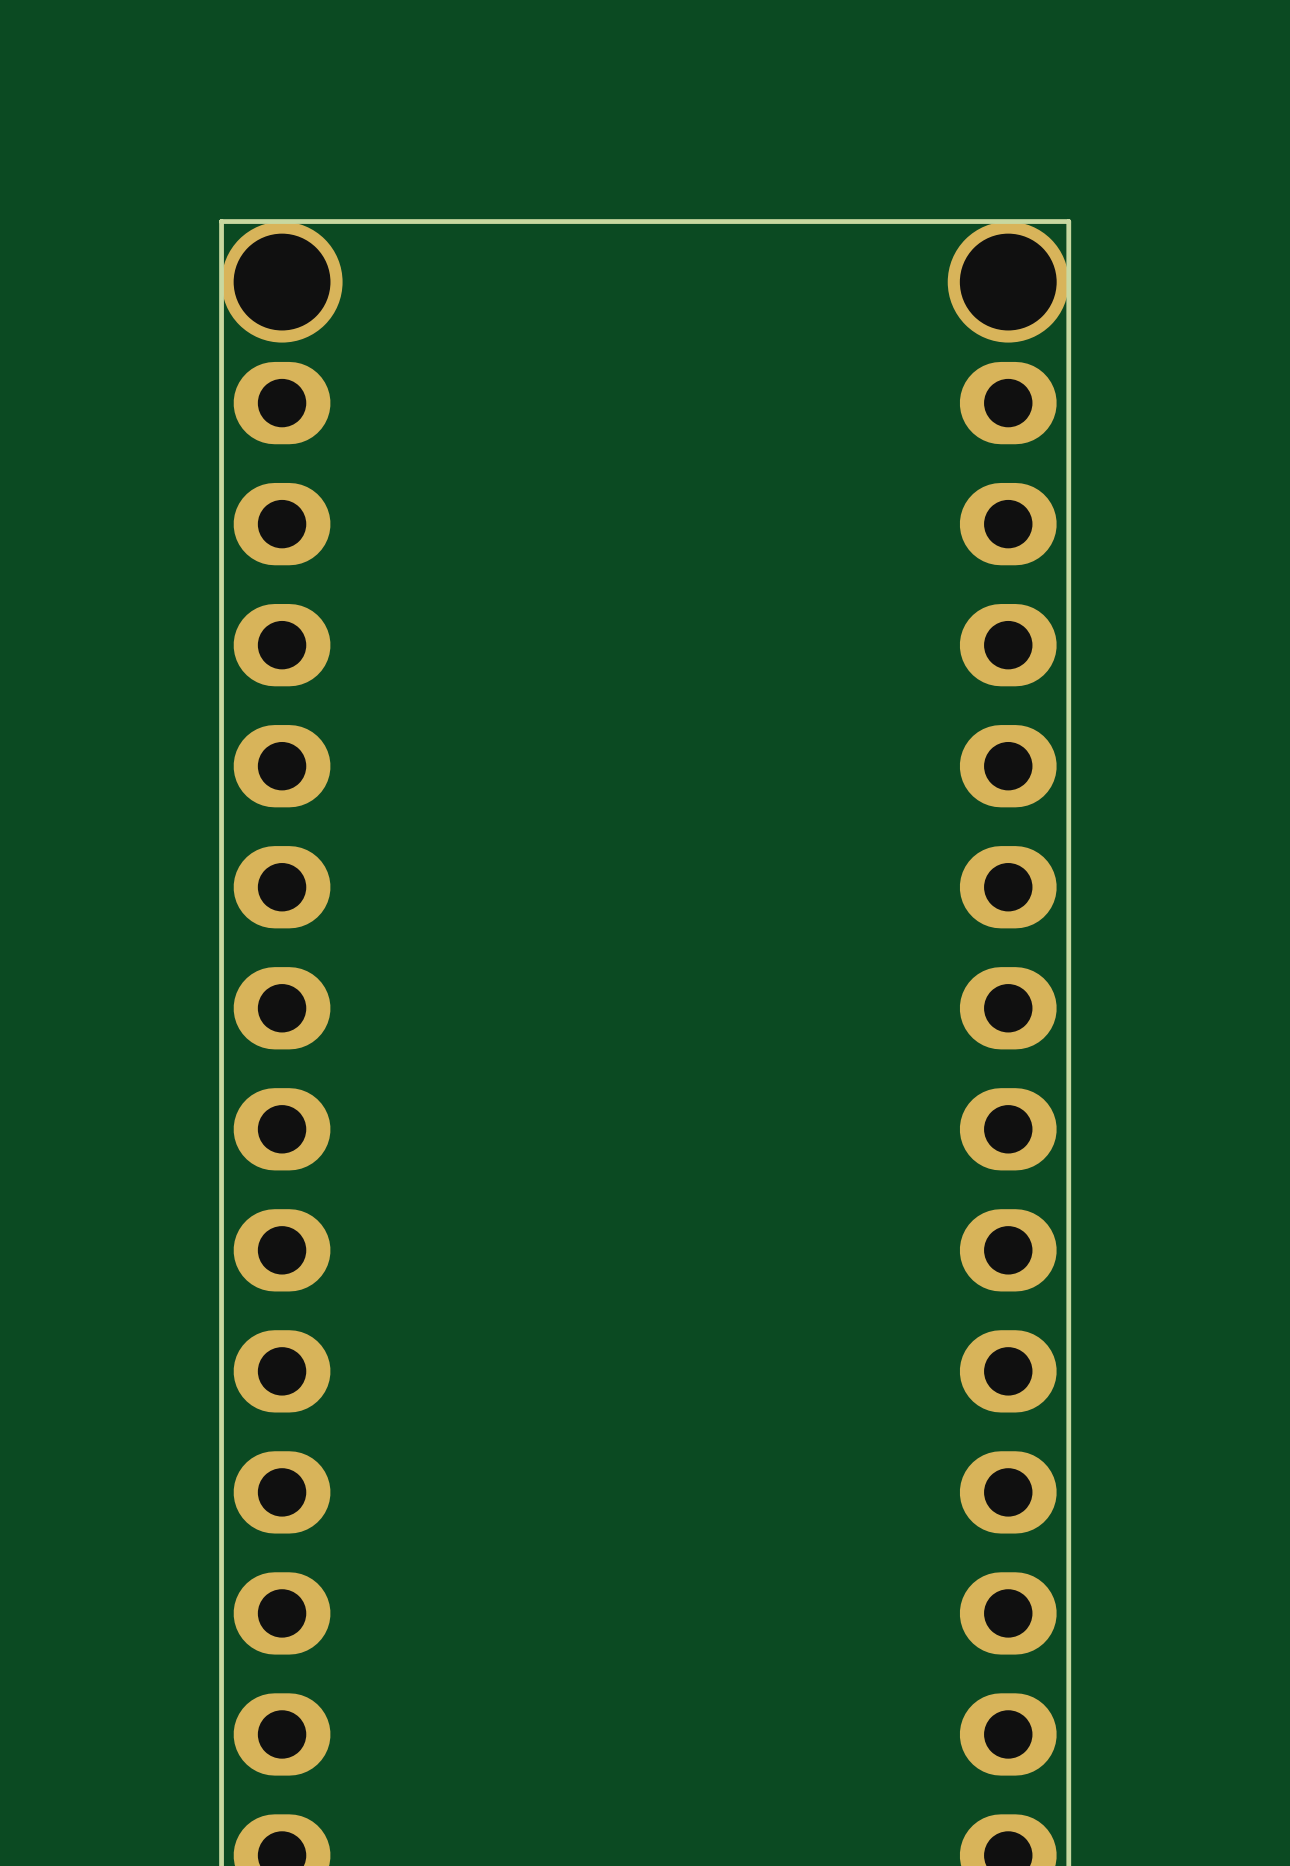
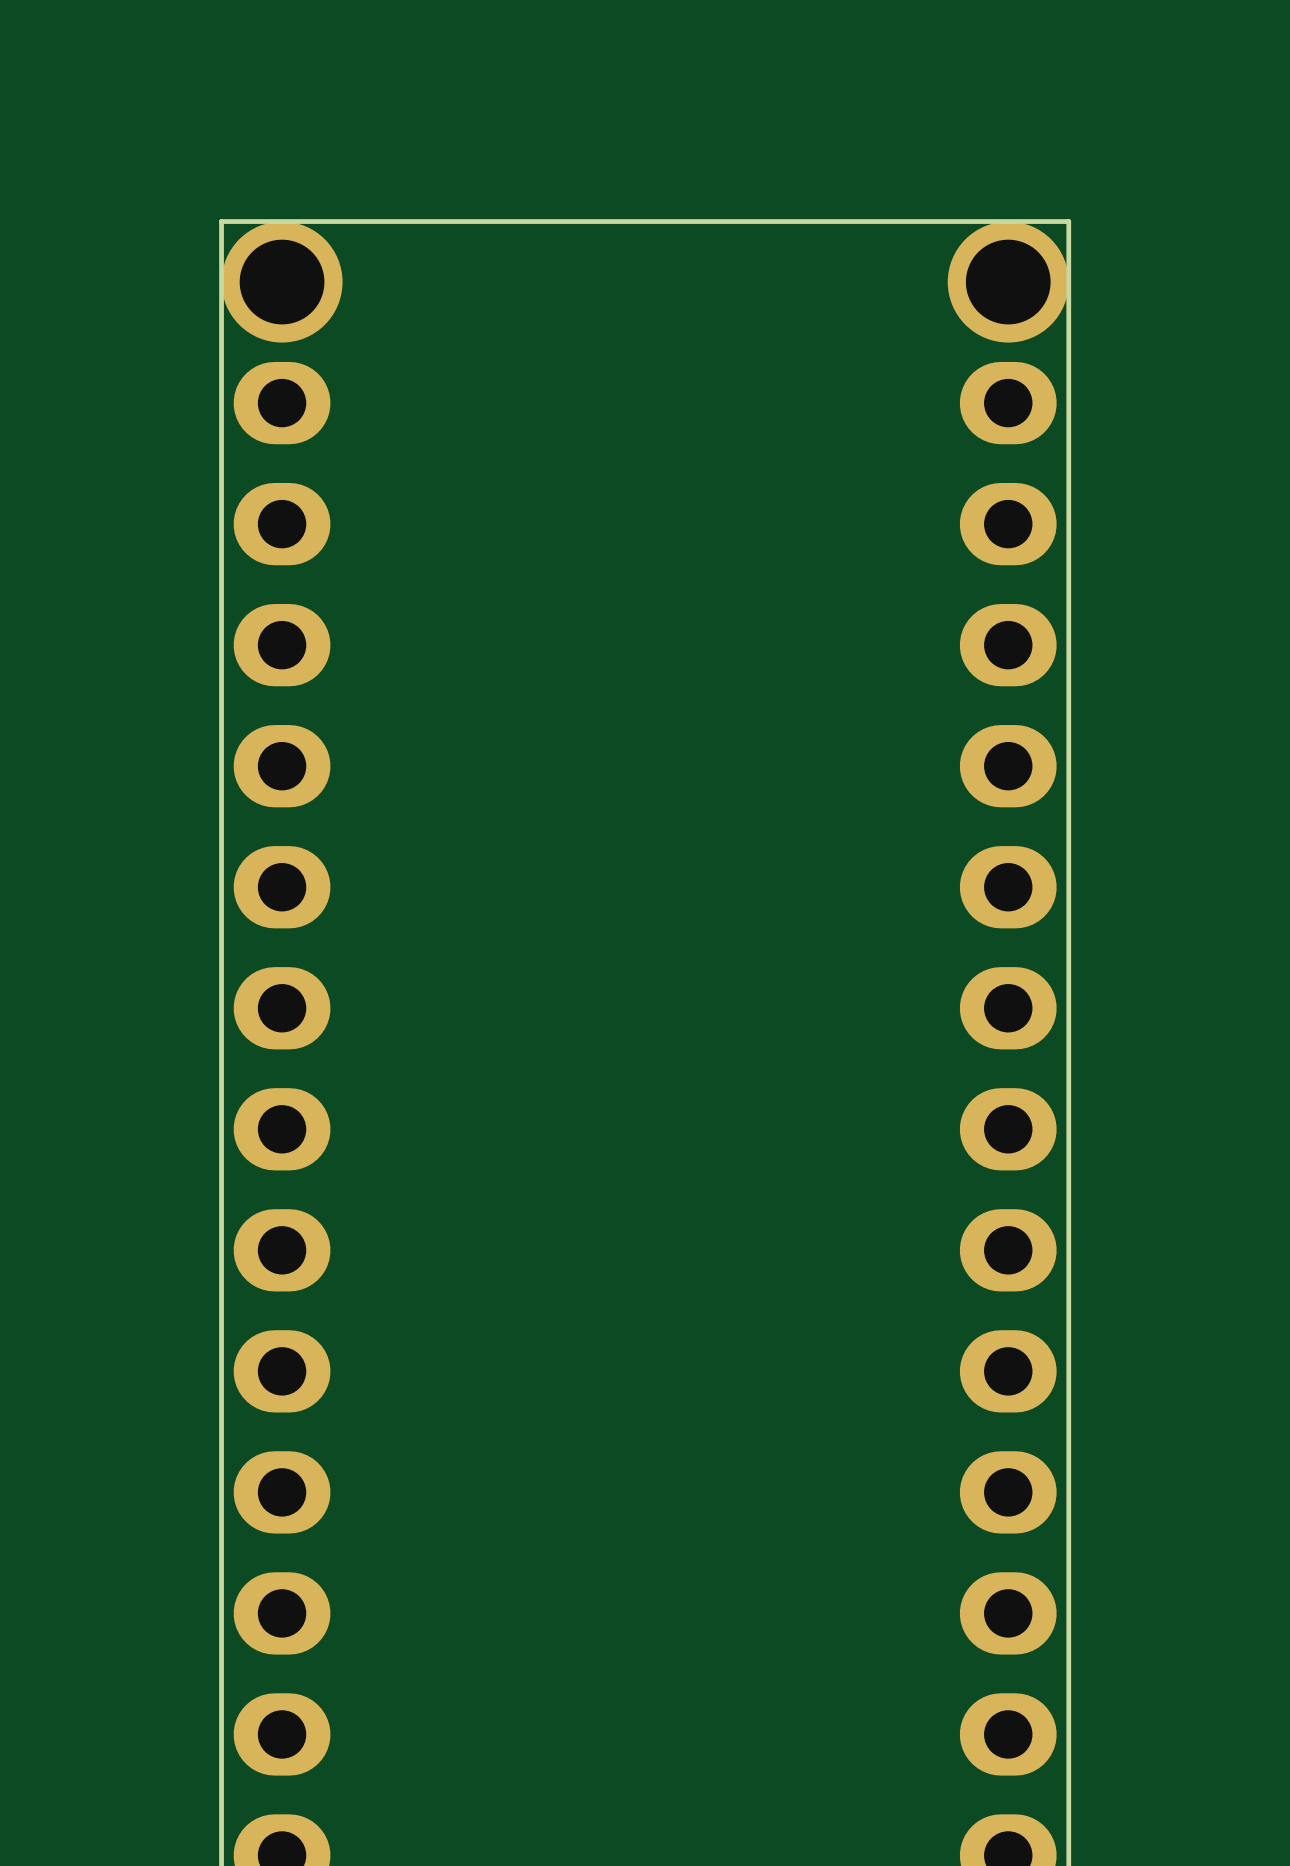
part footprint: [221, 221, 343, 343] -> [221, 221, 343, 343]
part footprint: [947, 221, 1069, 343] -> [947, 221, 1069, 343]

